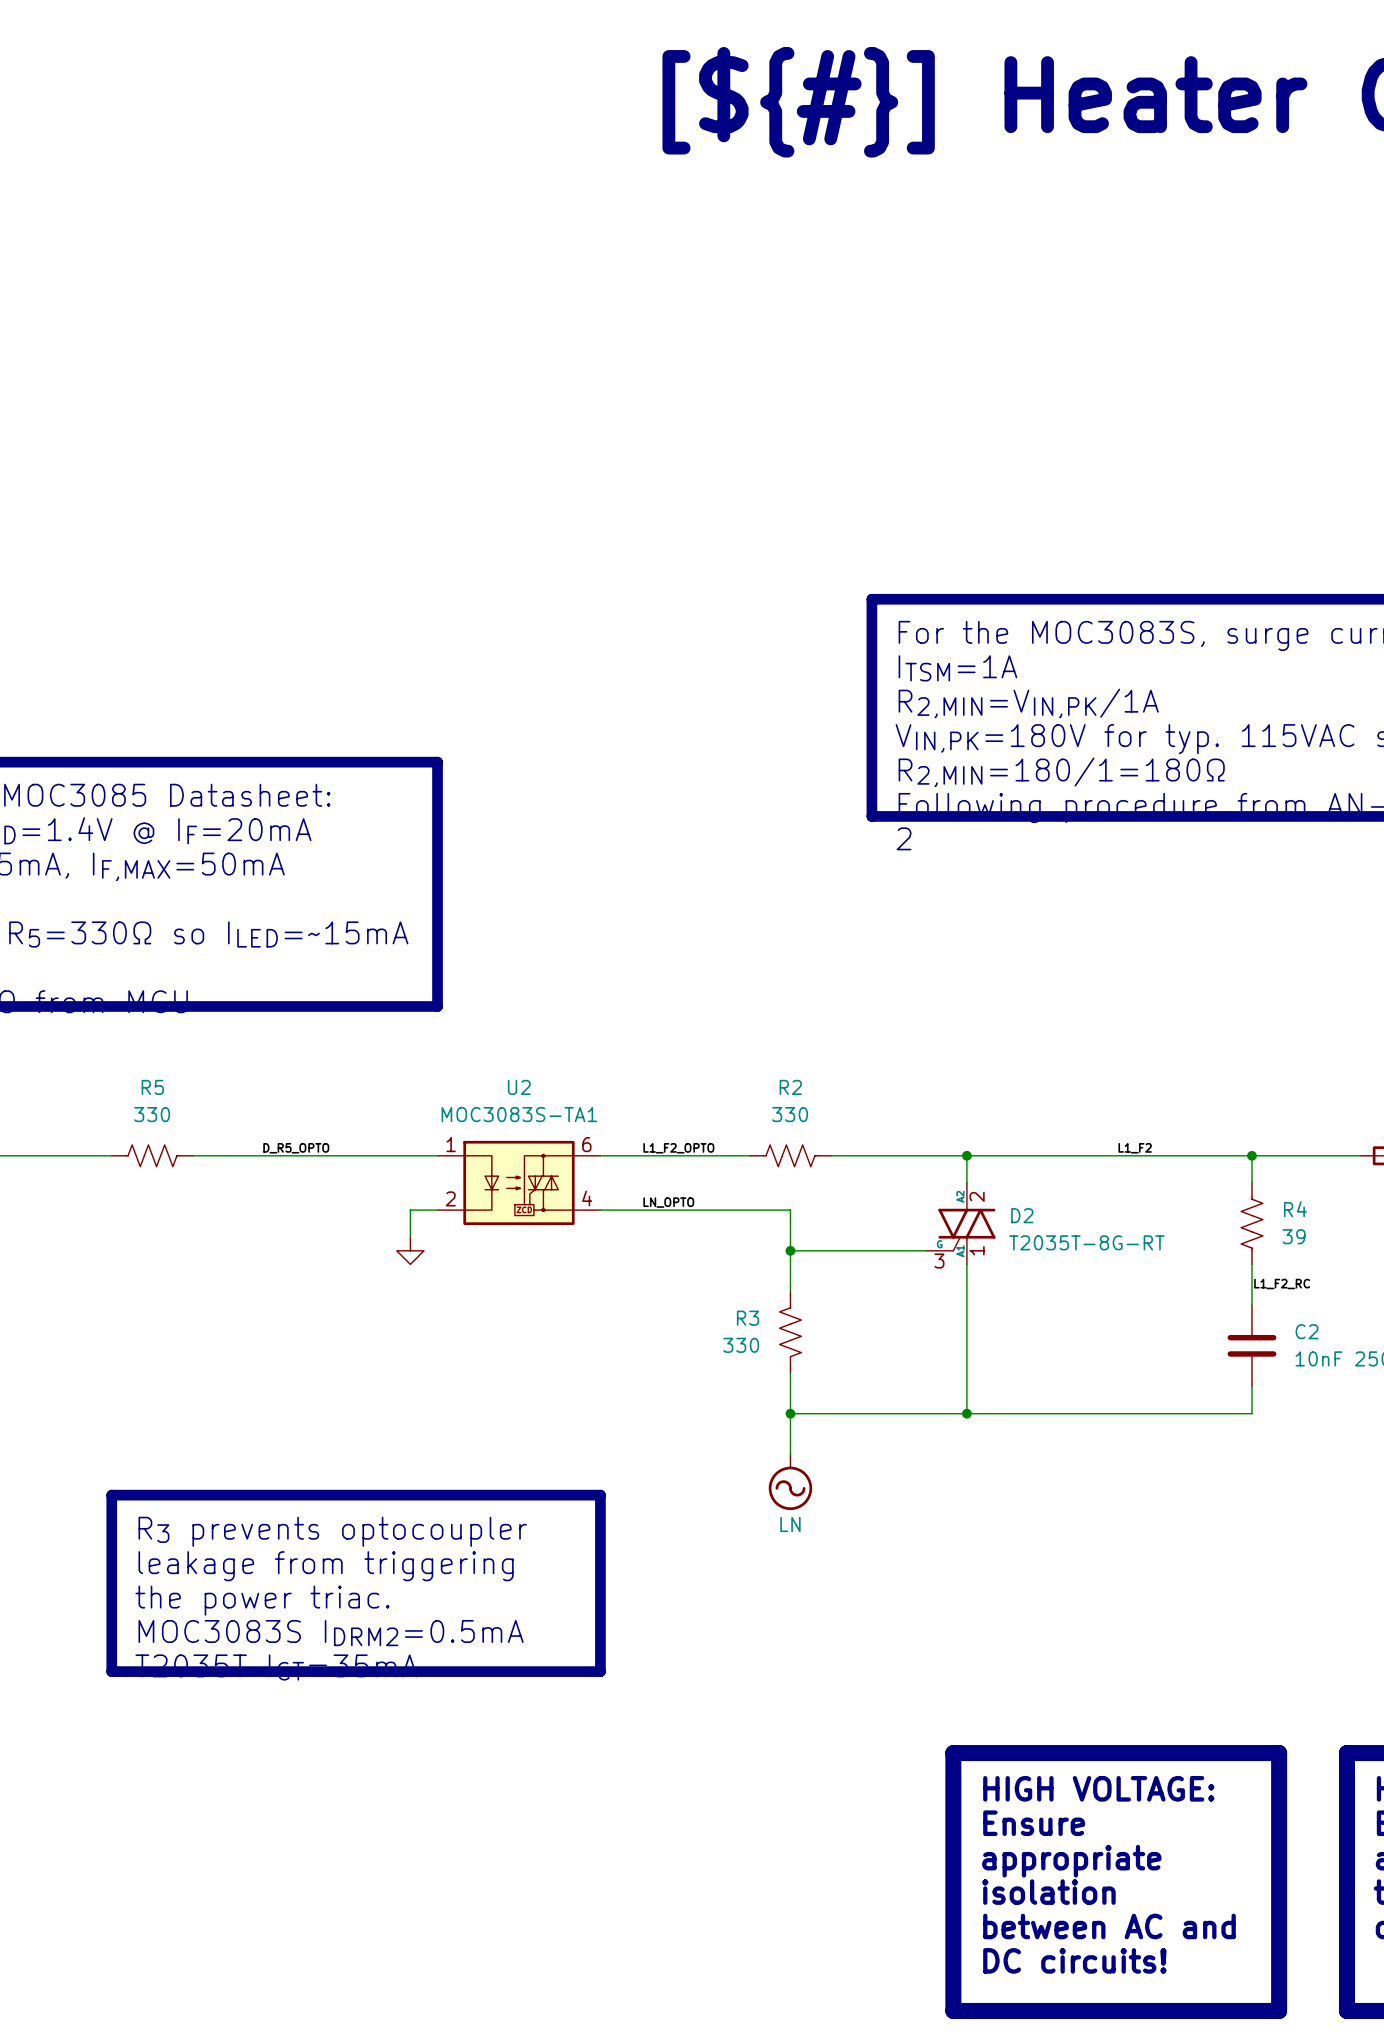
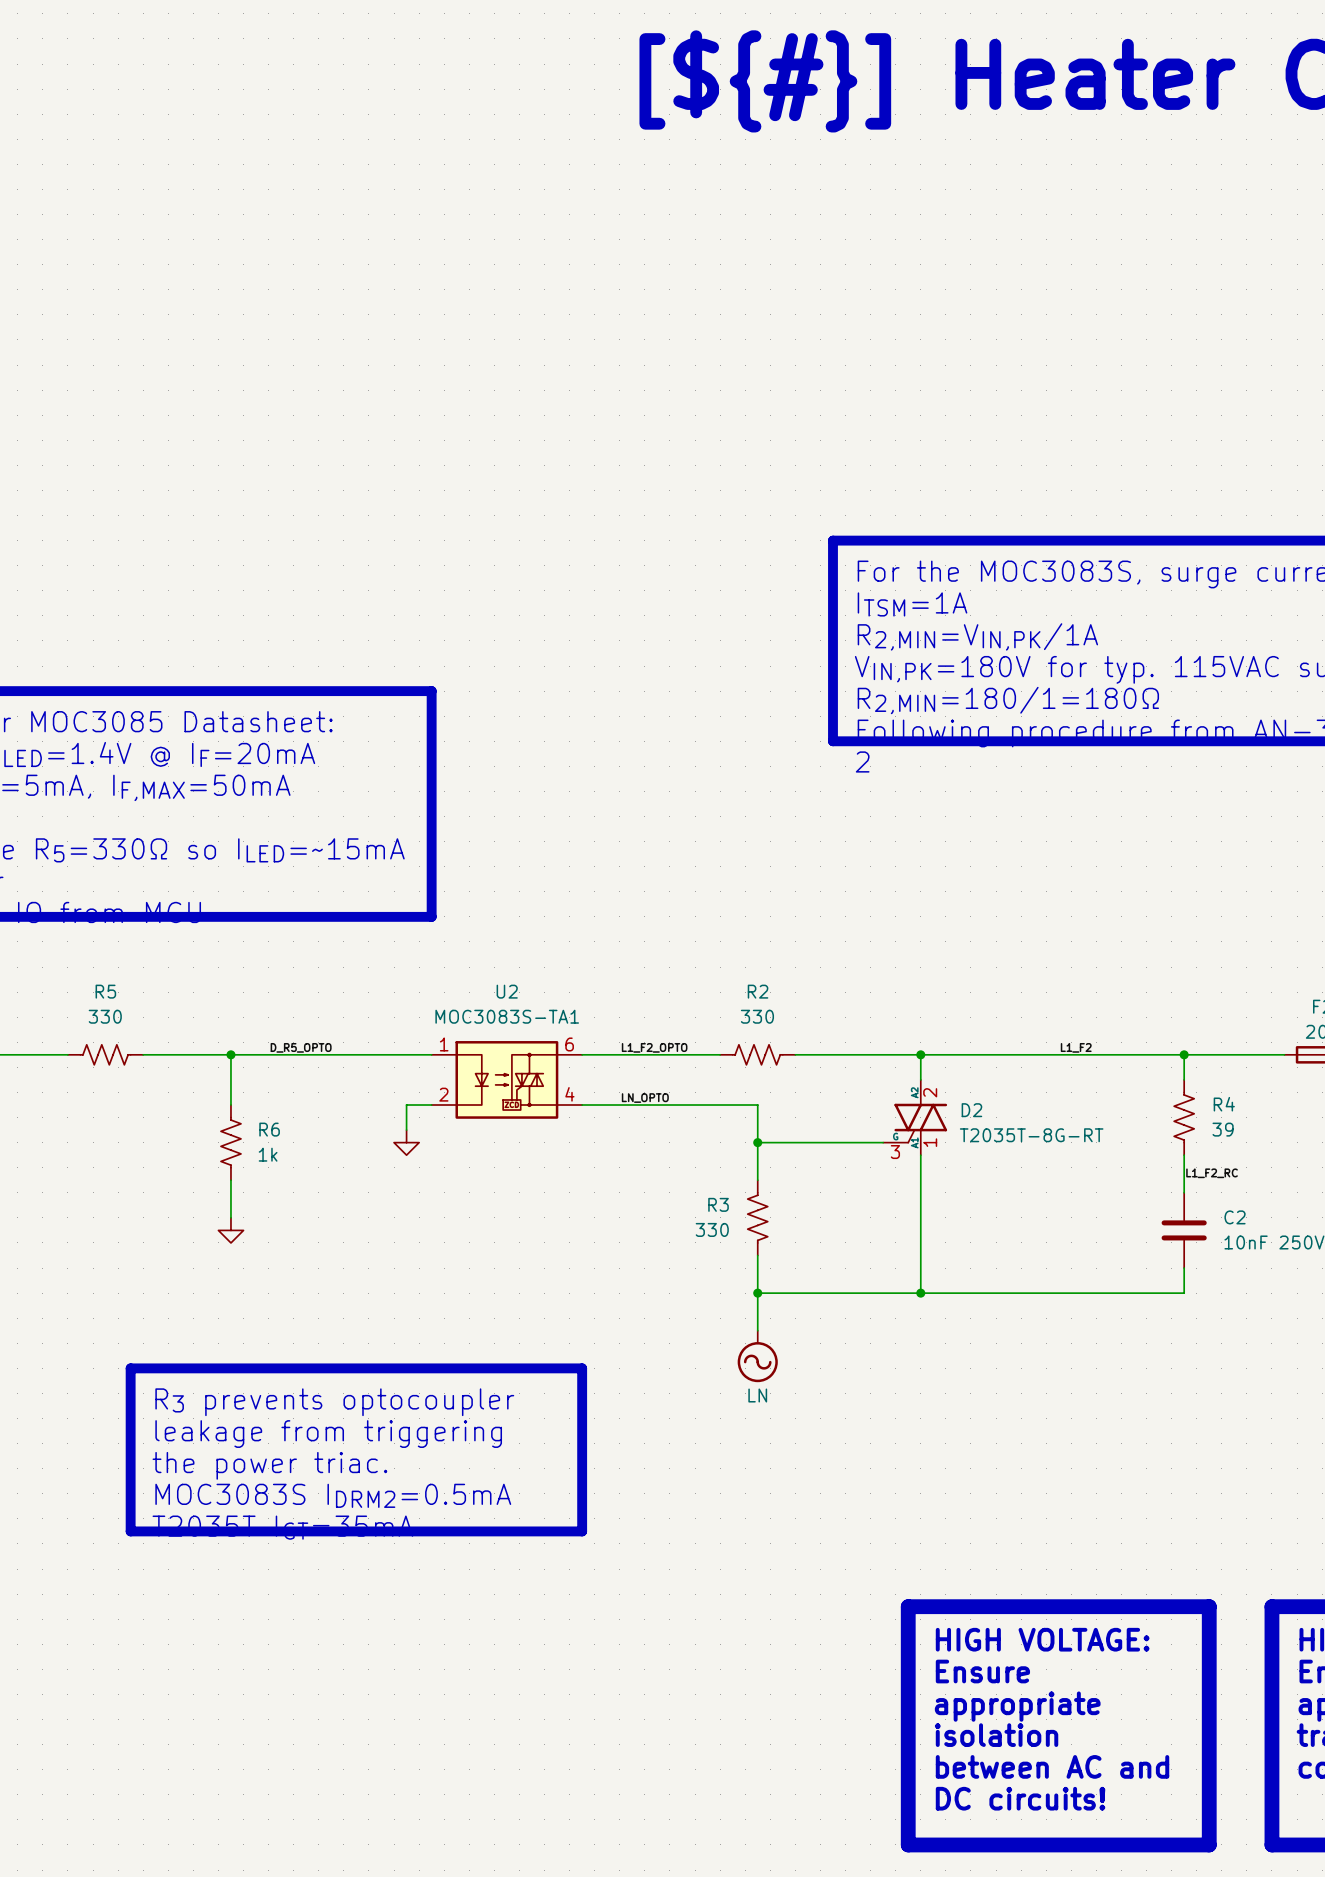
wire: (43, 1155) (111, 1155) -> (143, 1054) (205, 1054)
R5 position: (152, 1155) -> (105, 1054)
wire: none -> (230, 1054) (230, 1105)
junction: none -> (230, 1054)
R6: none -> 1k (230, 1142)
wire: none -> (230, 1180) (230, 1217)
power symbol: none -> (230, 1230)

